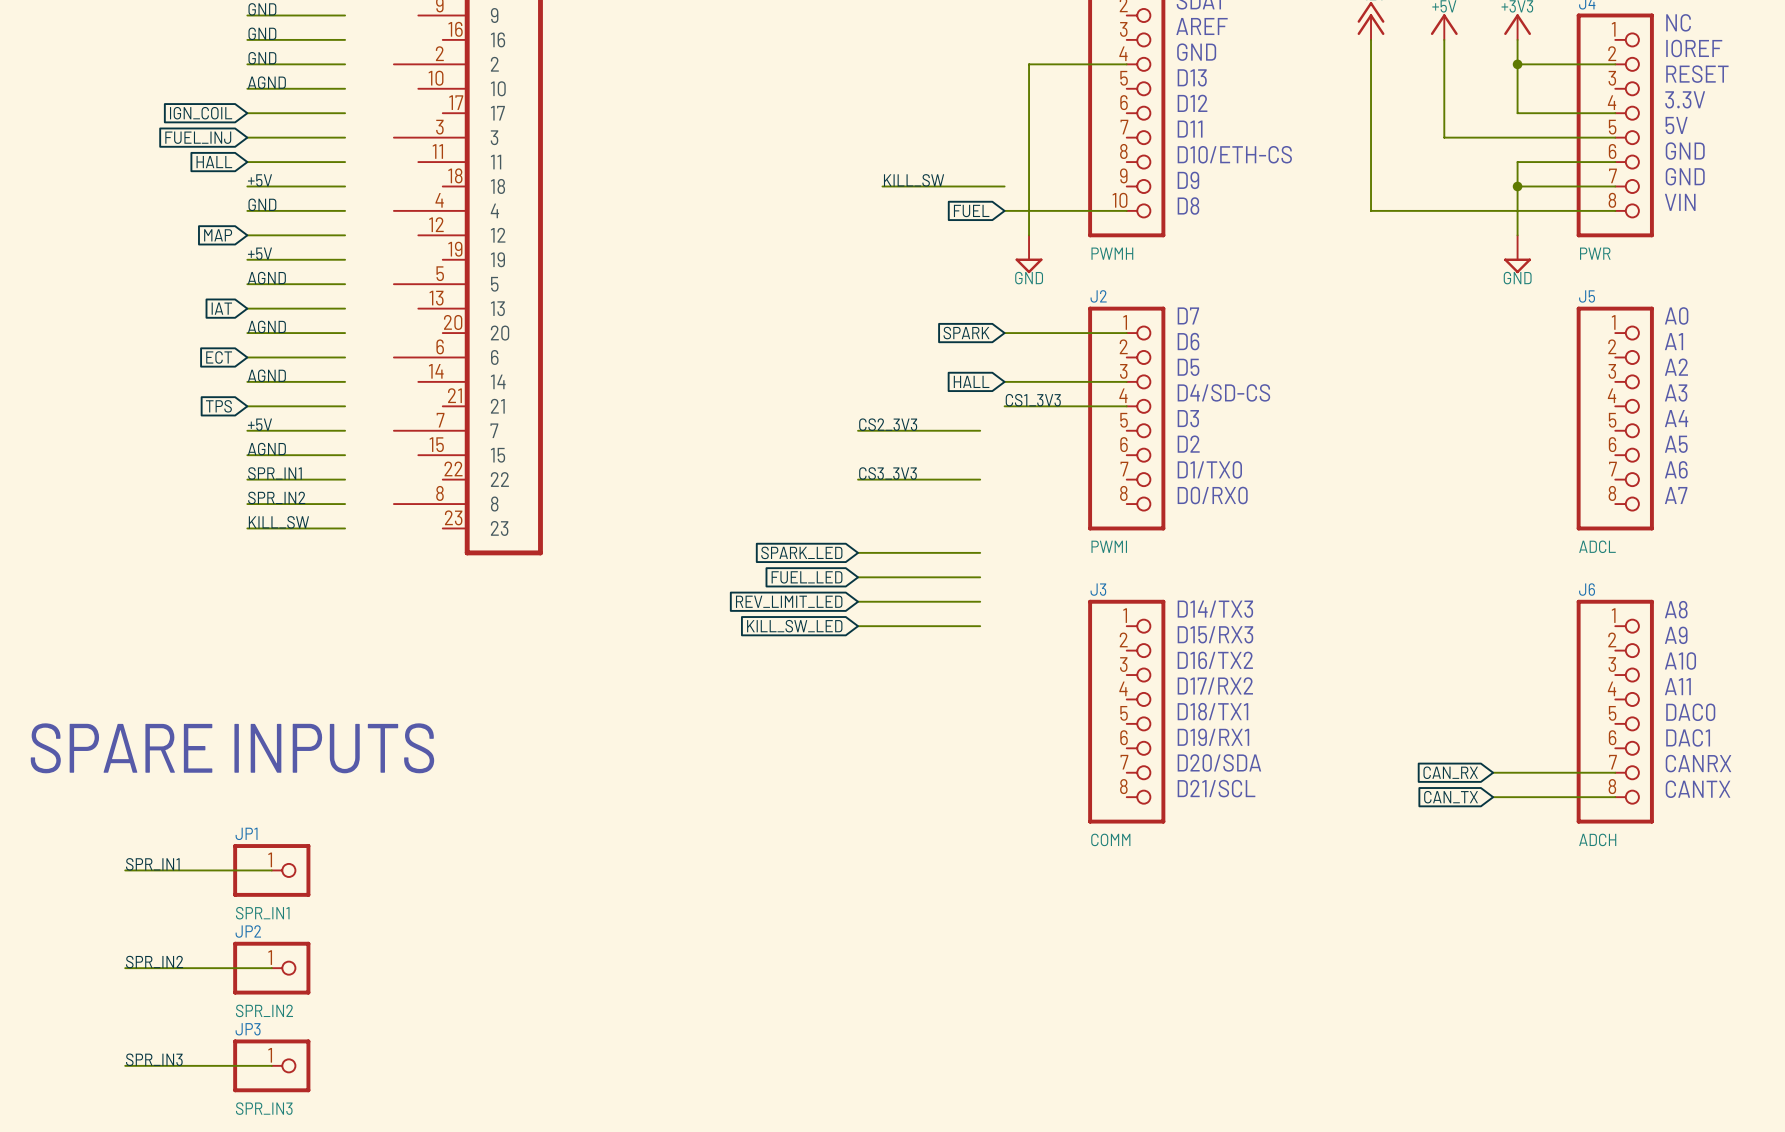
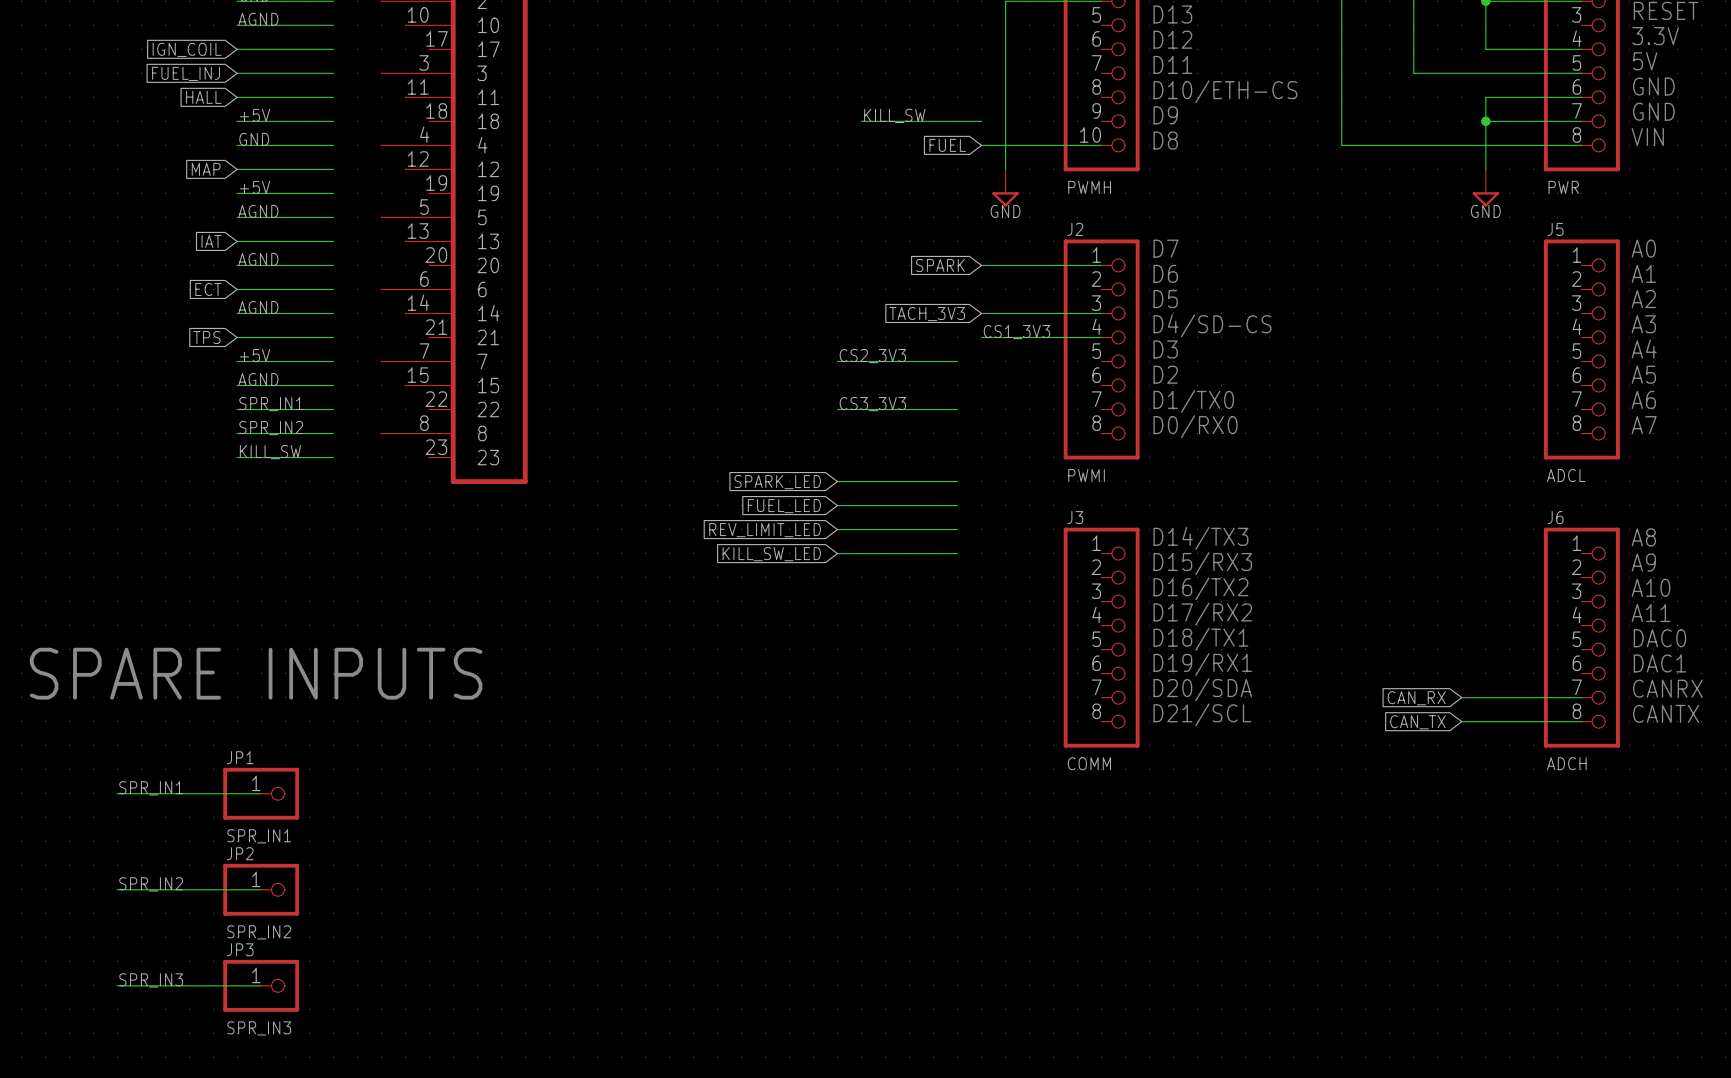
global label: HALL (971, 381) -> TACH_3V3 (927, 314)

